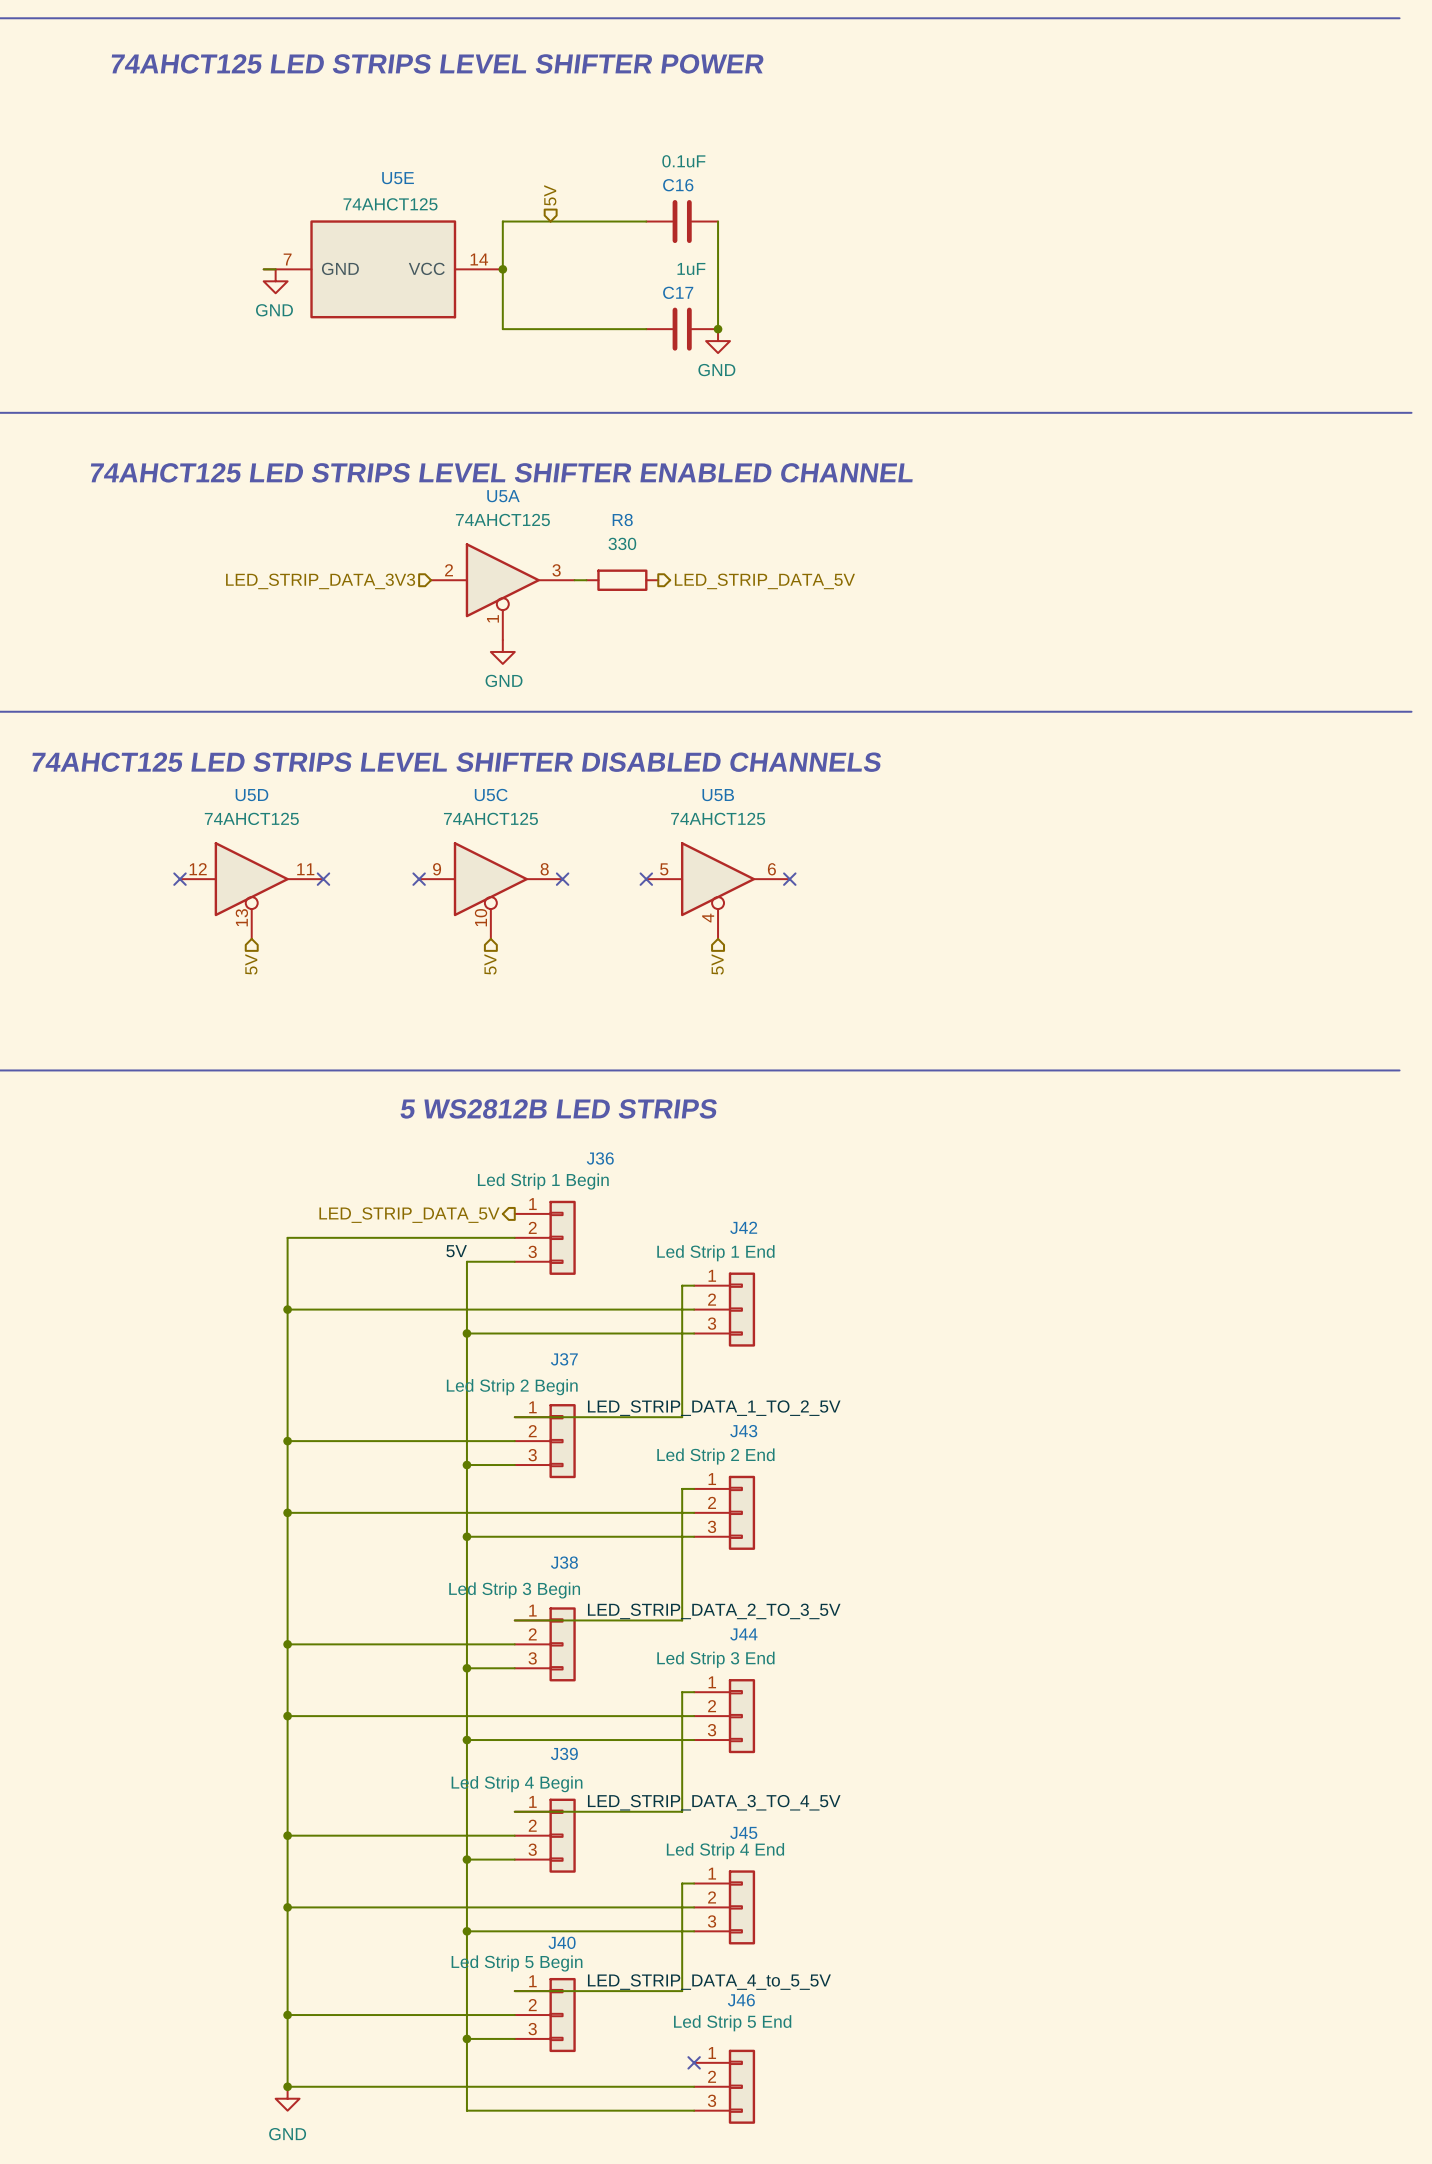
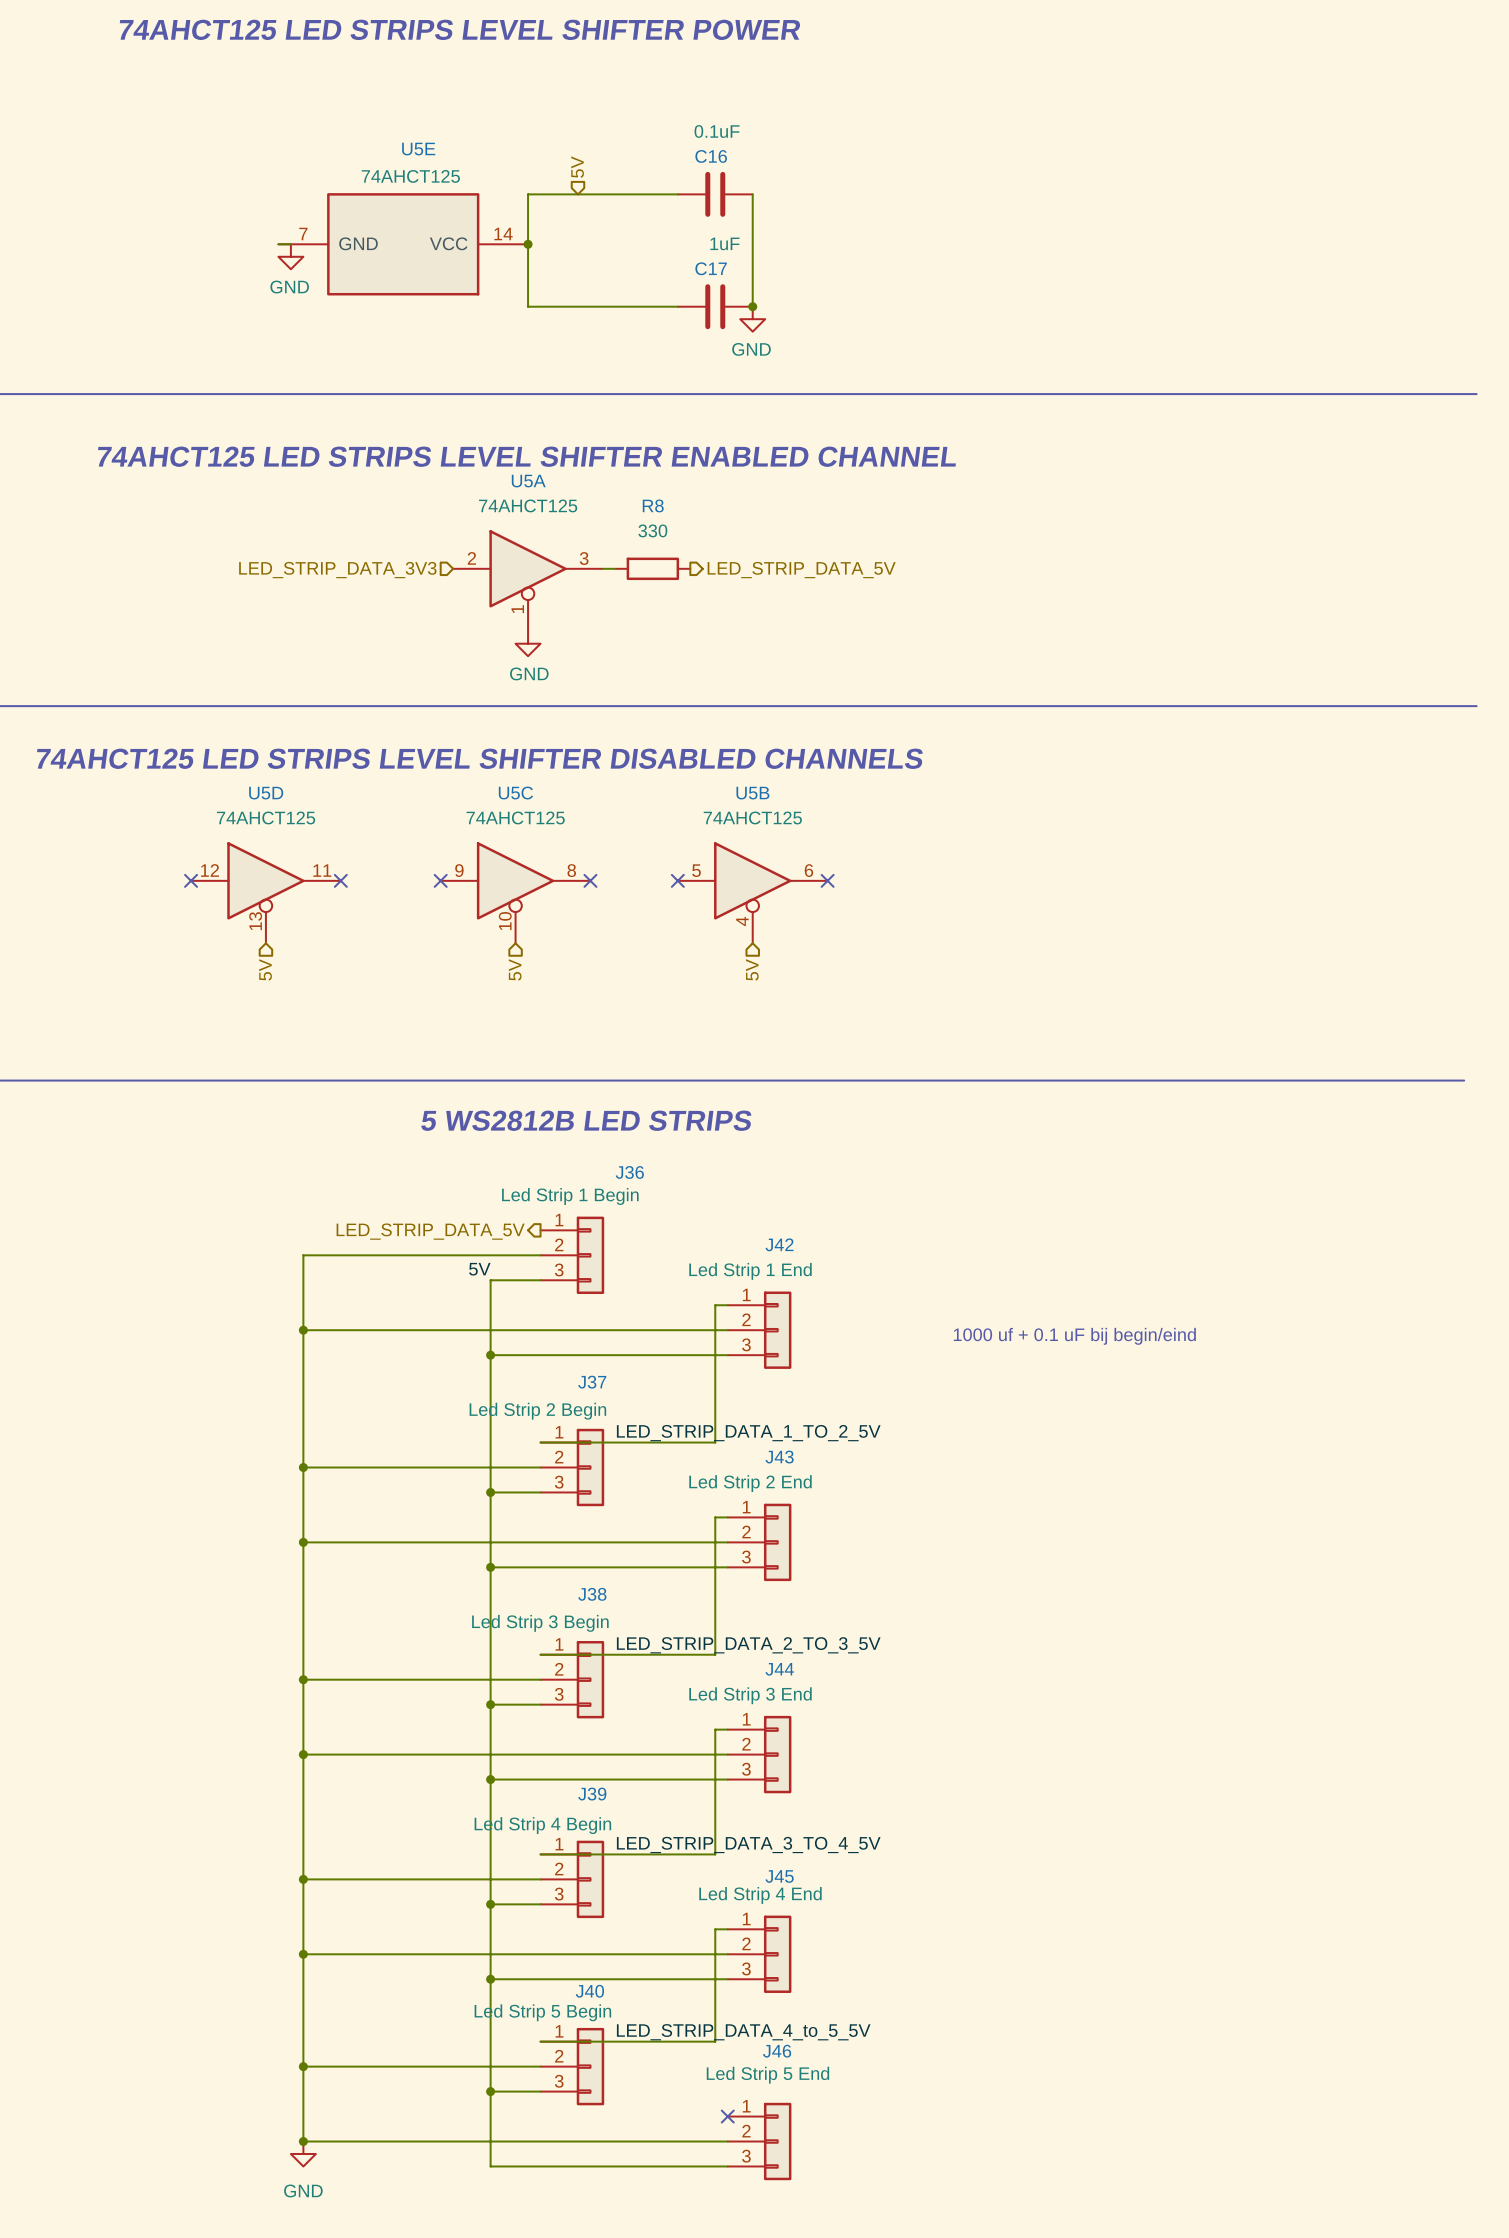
text: none -> 1000 uf + 0.1 uF bij begin/eind (1074, 1336)

